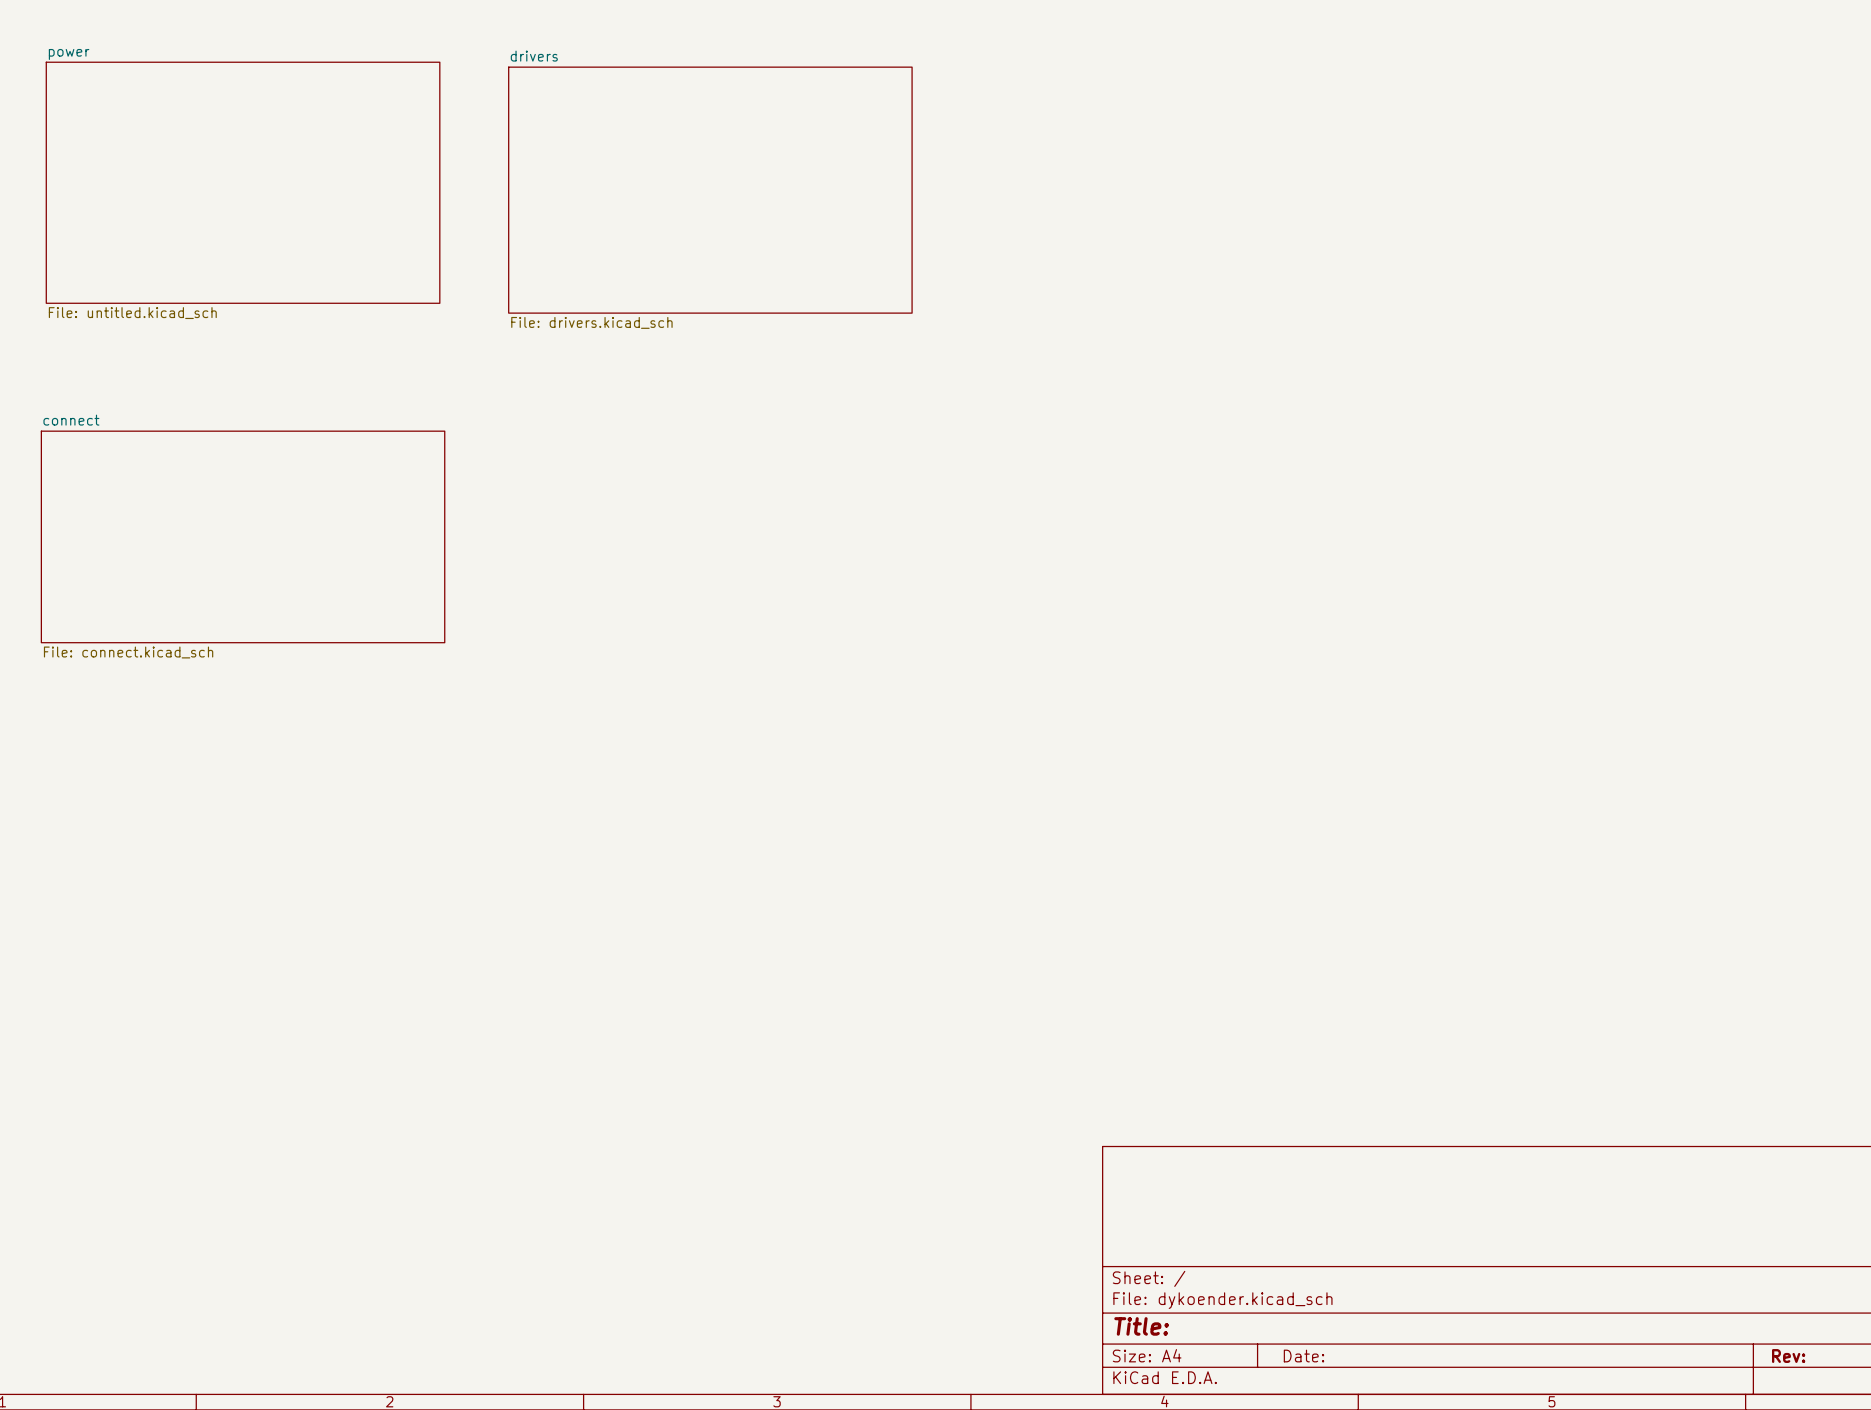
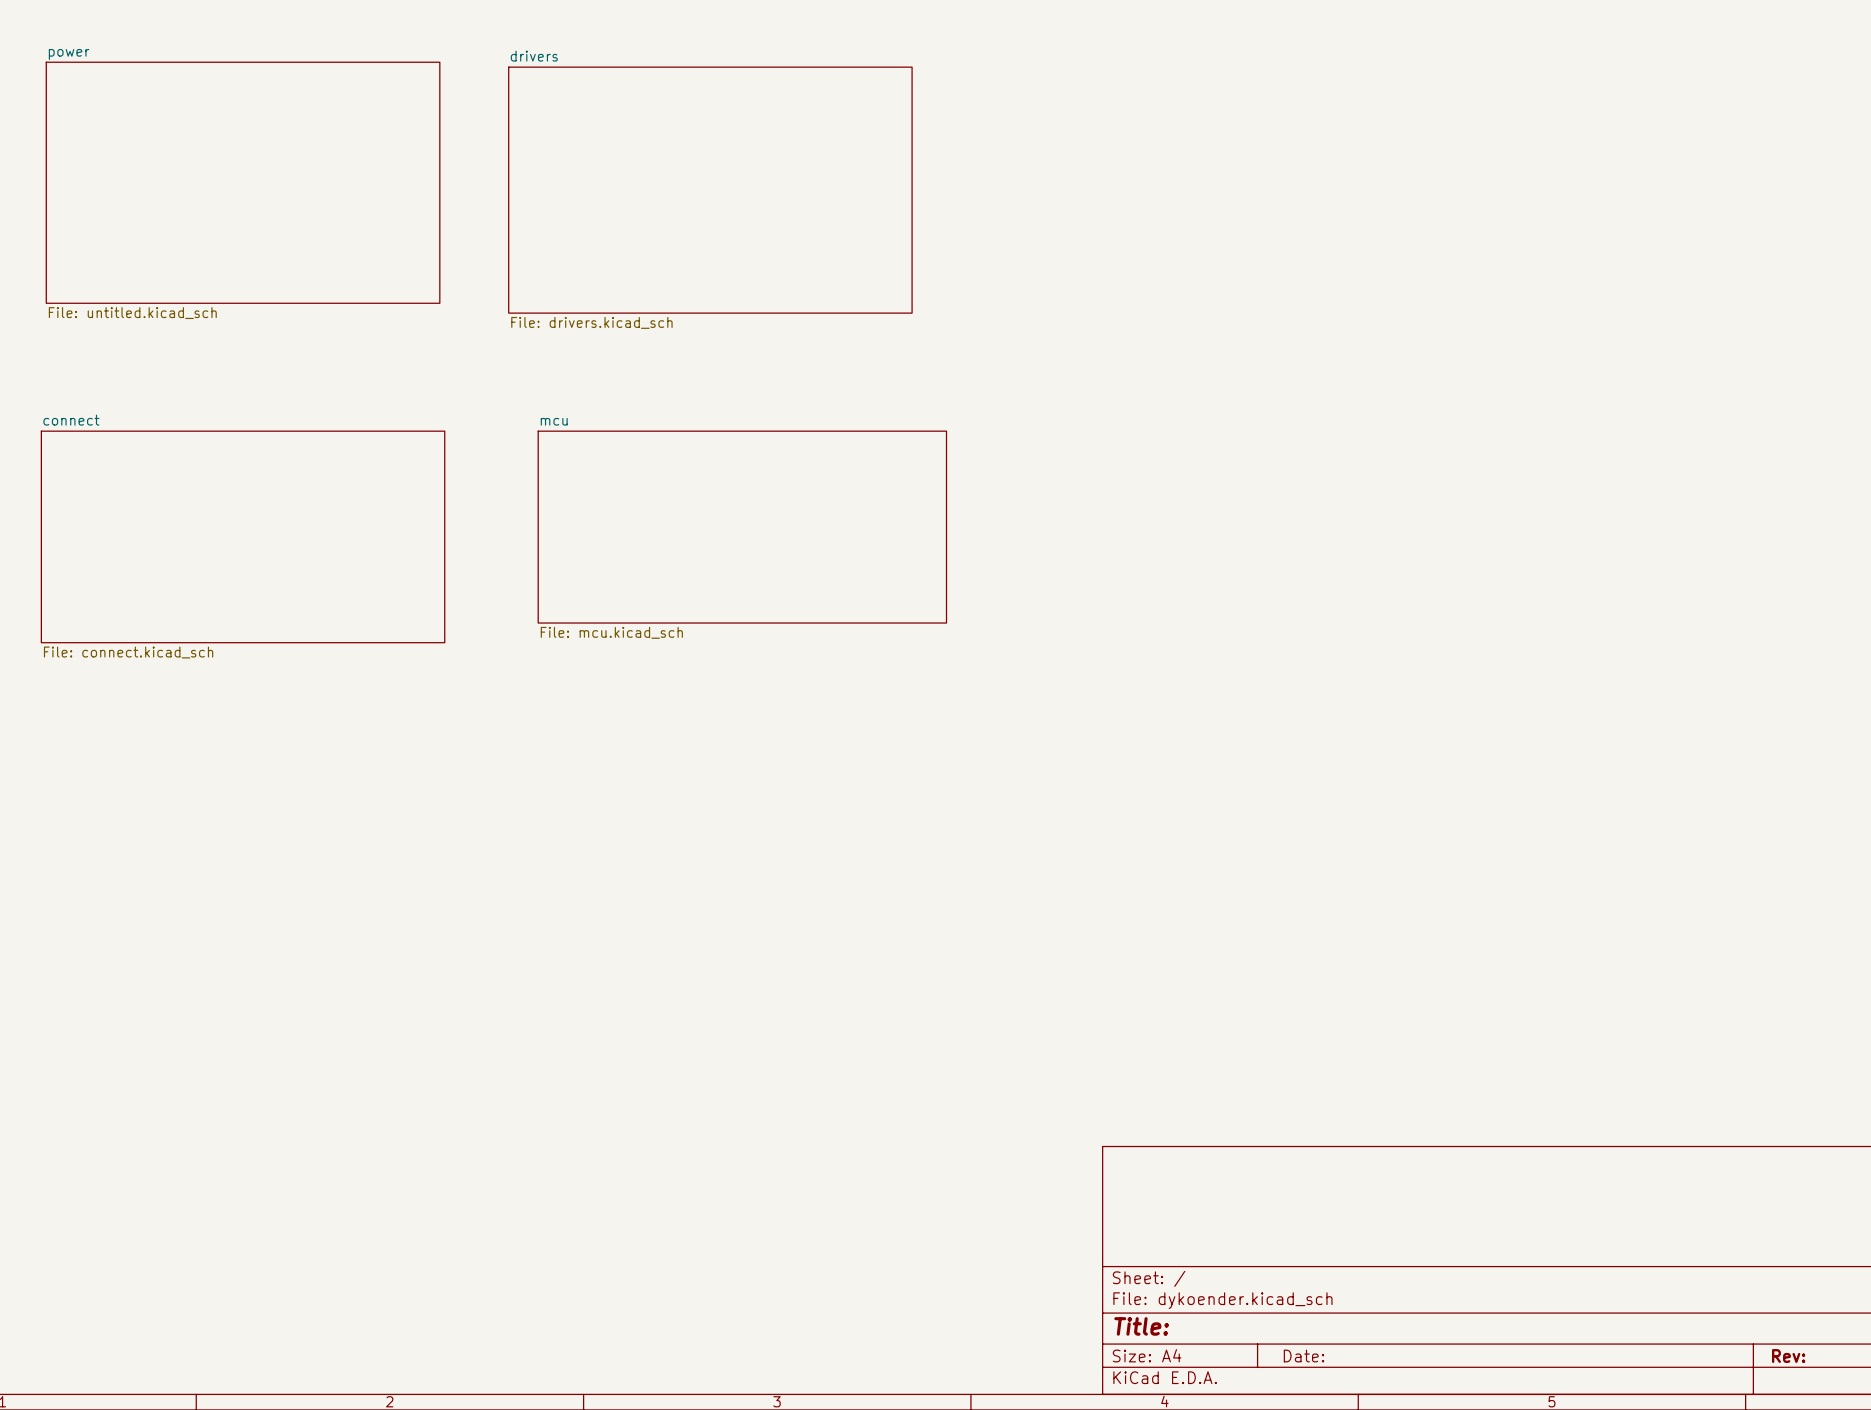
sheet mcu: none -> File: mcu.kicad_sch (742, 527)

